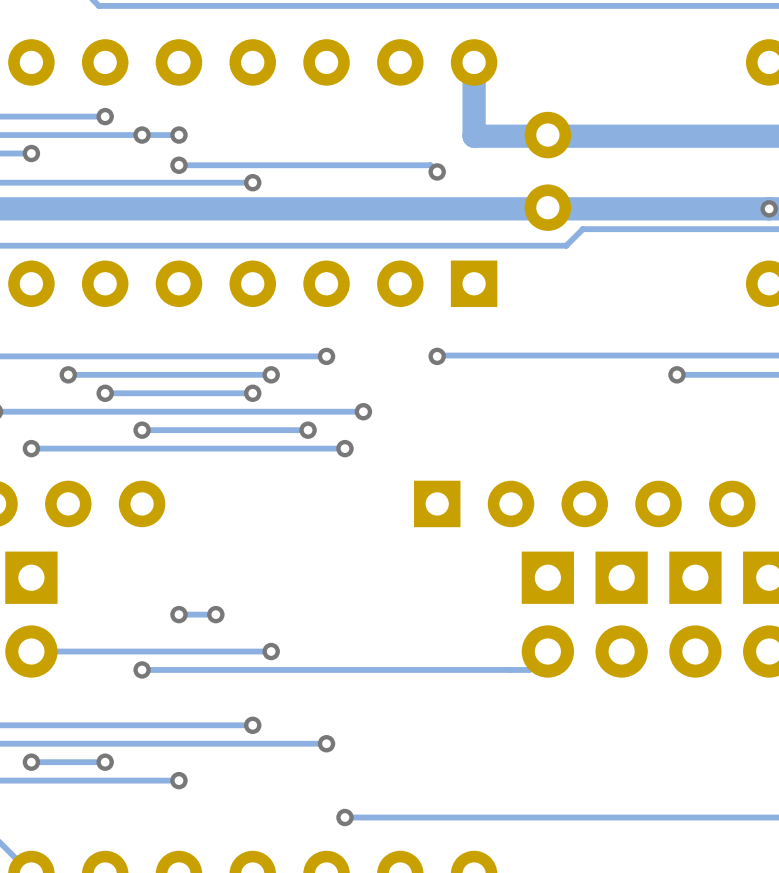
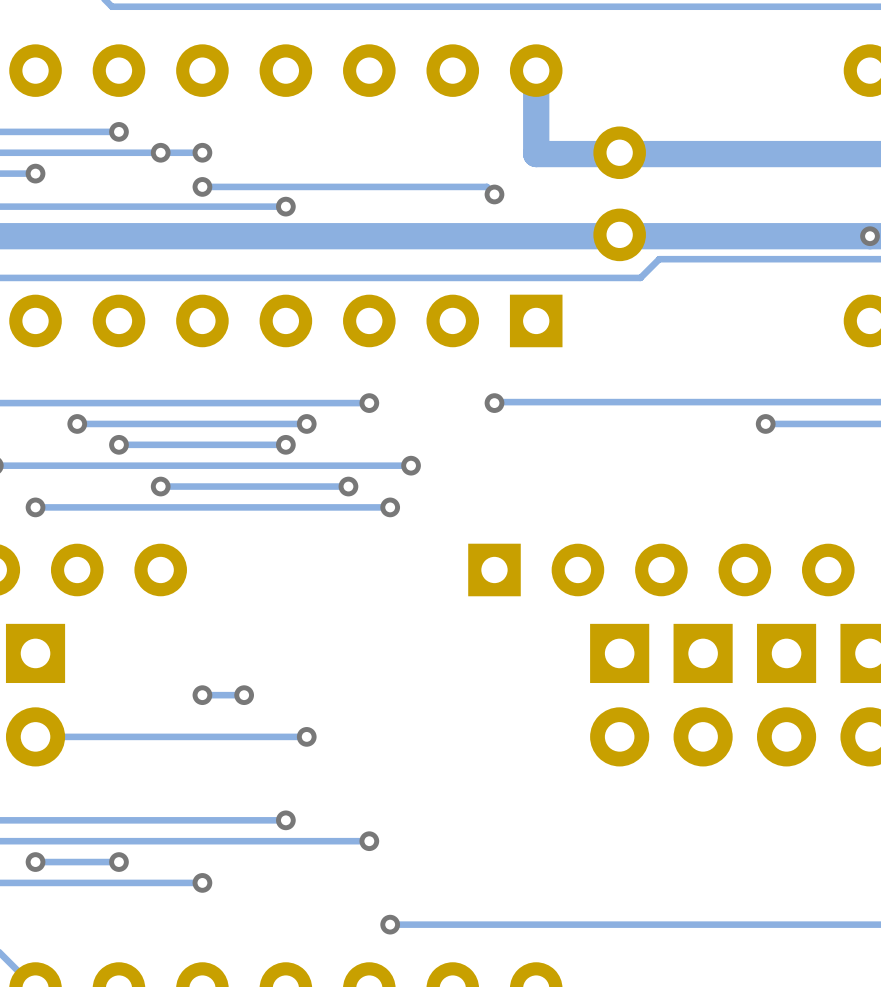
track: (547, 651) (529, 669) (142, 669) -> none
via: (142, 669) -> none

